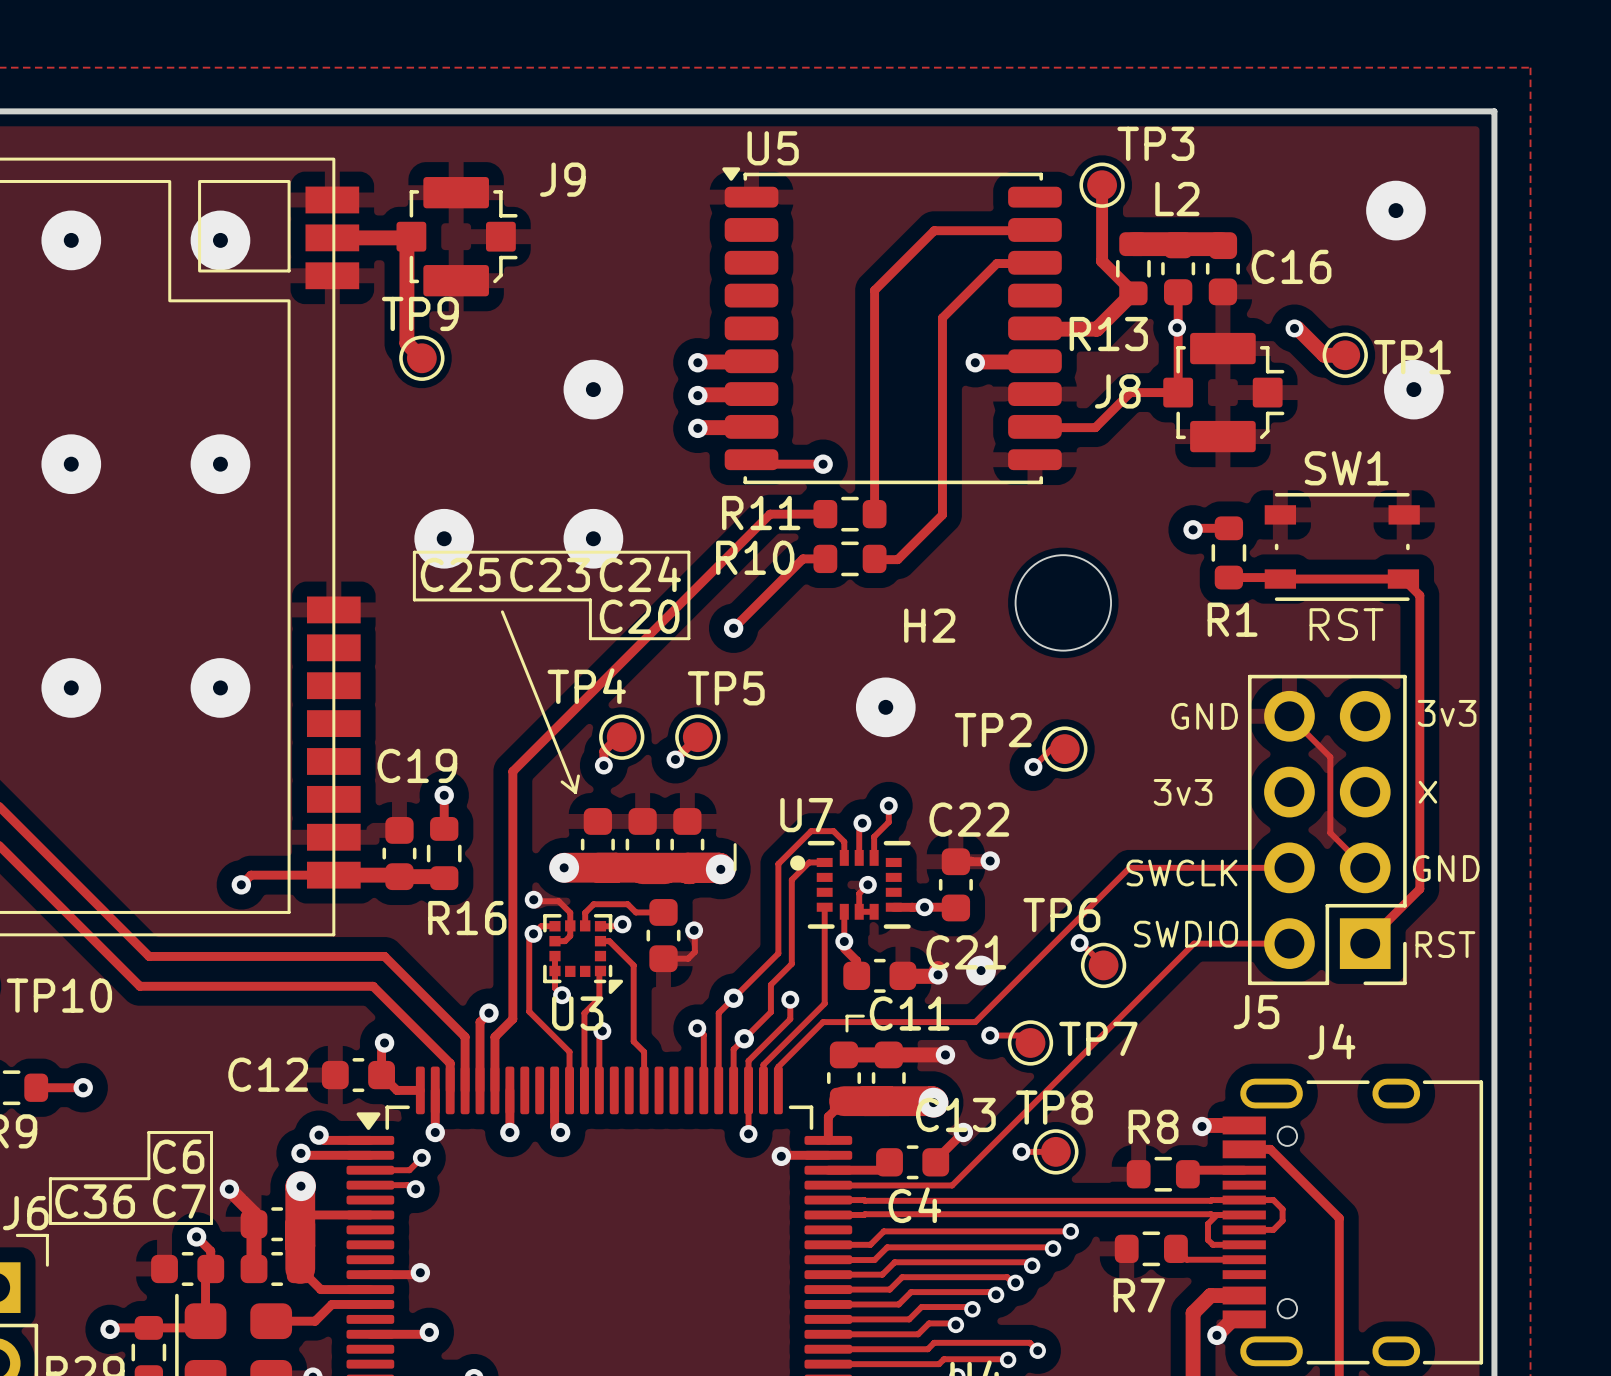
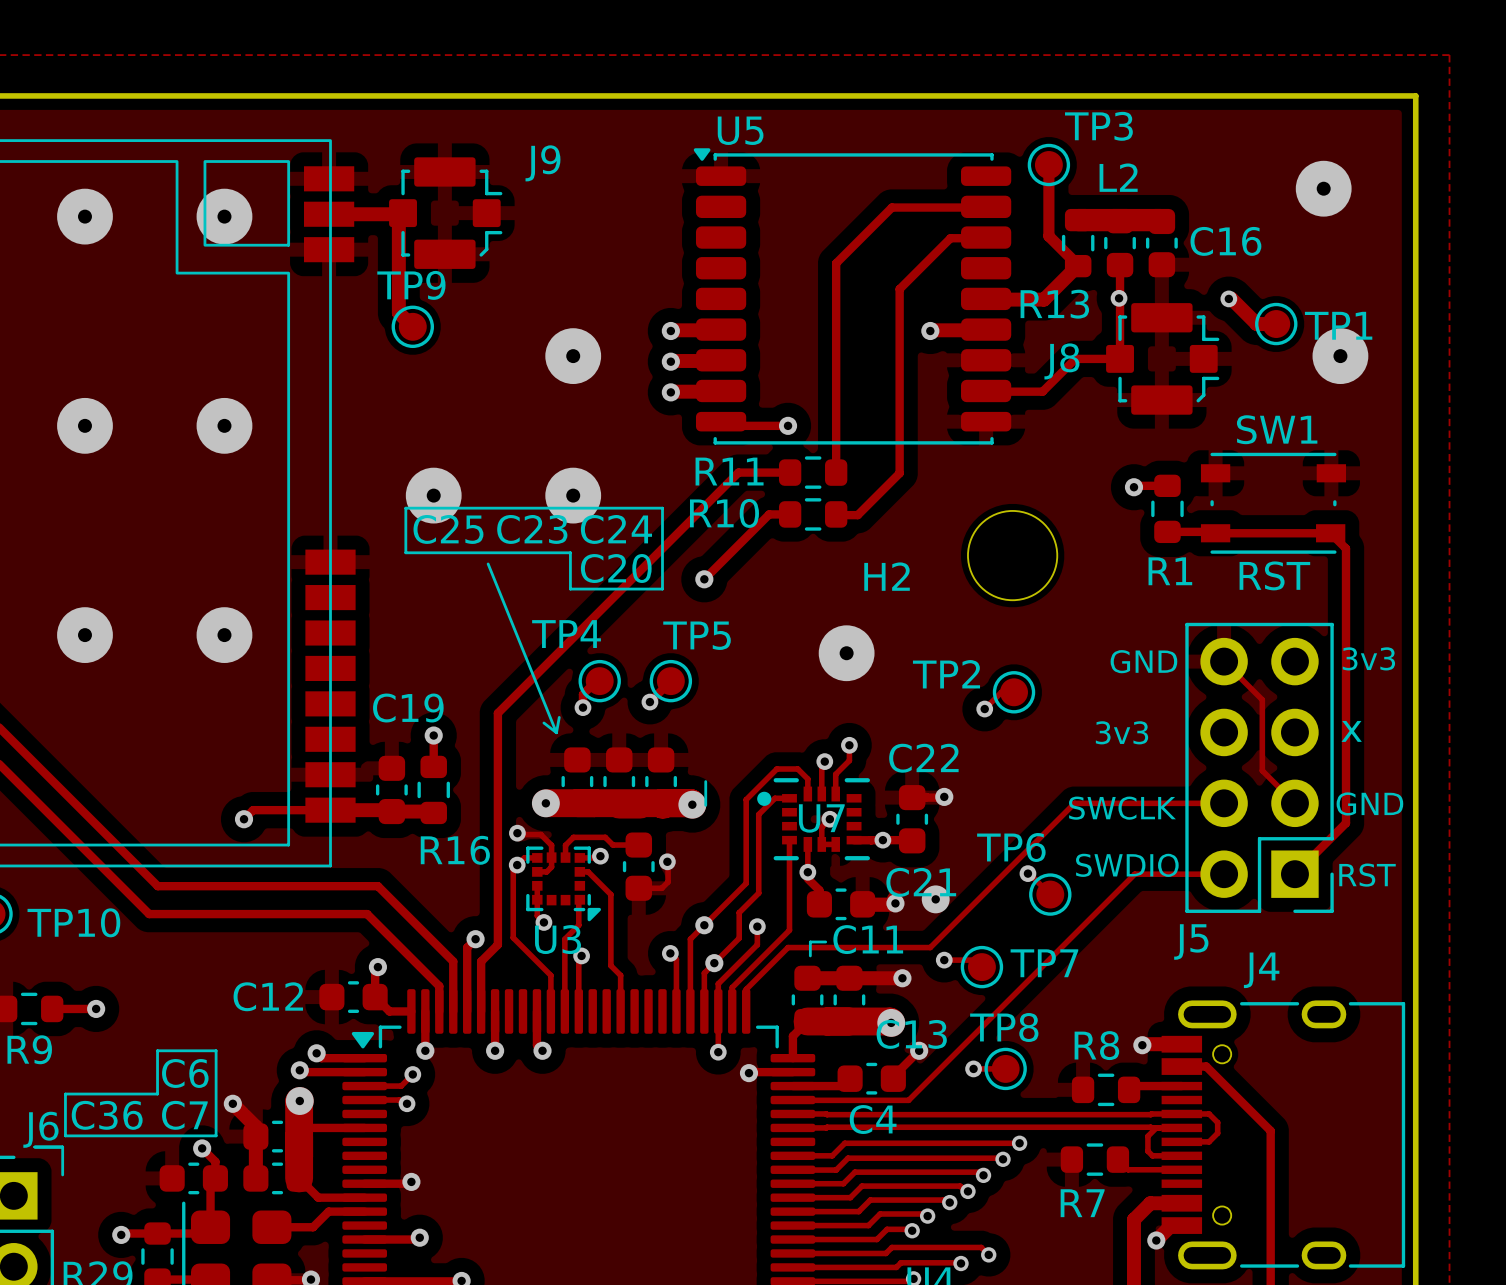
U7 name position: U7 (806, 815) -> U7 (821, 818)

